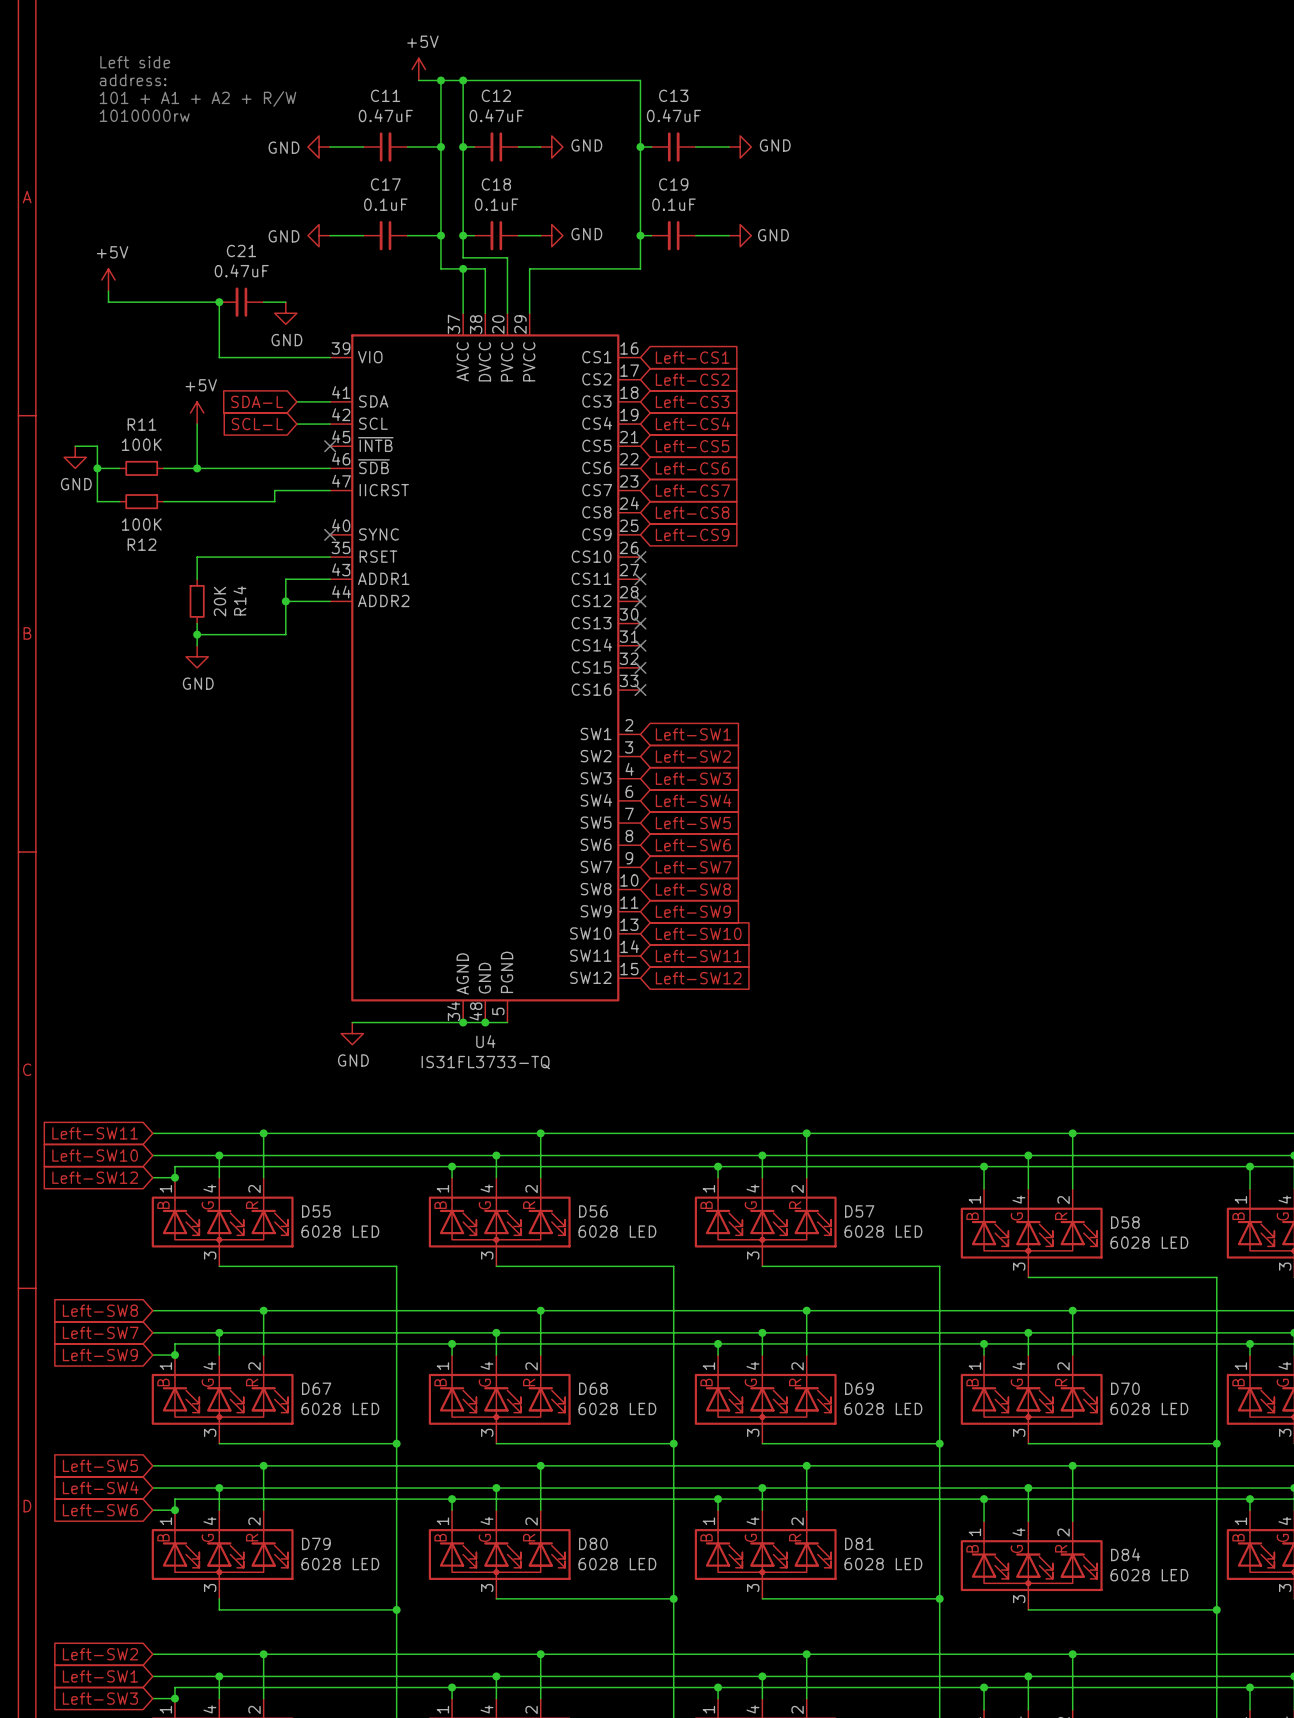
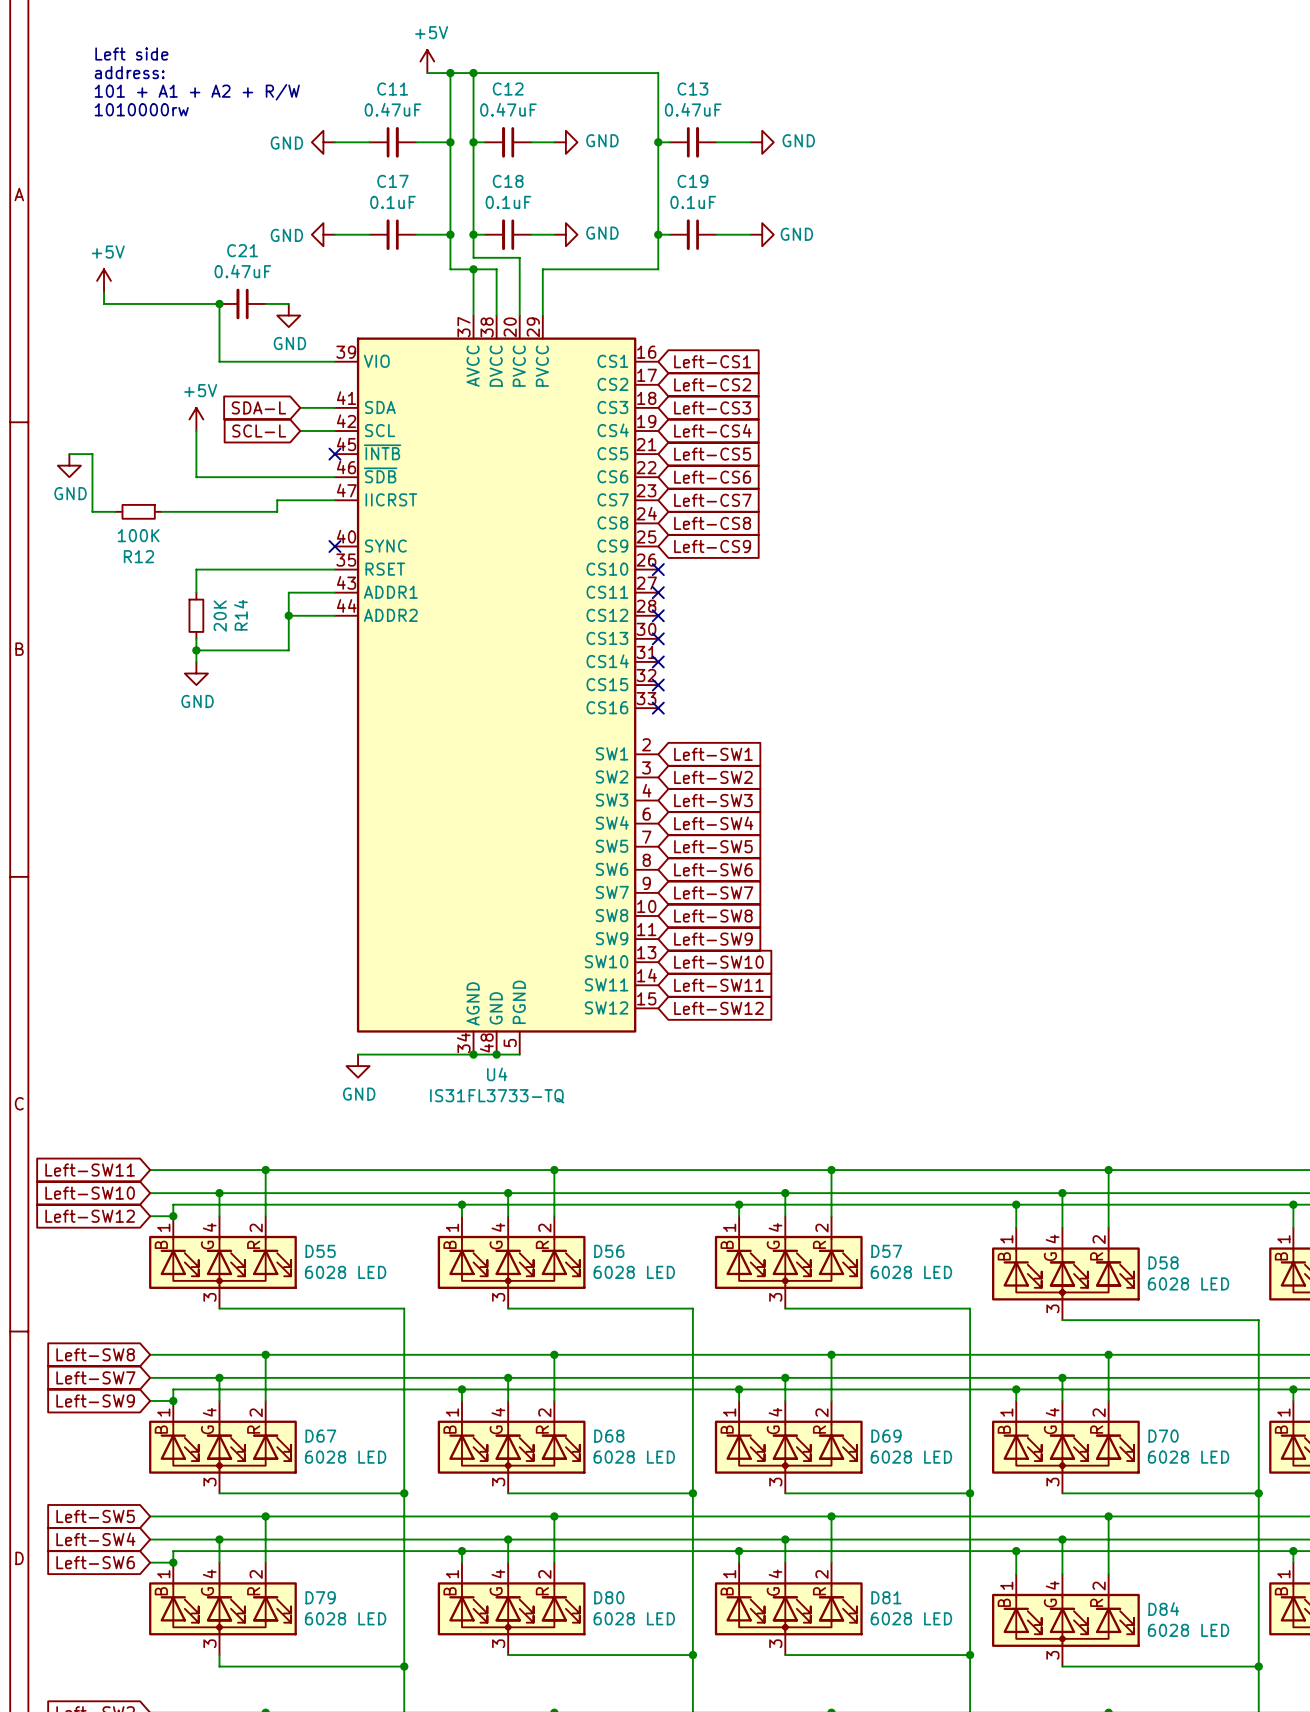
wire: (97, 468) (119, 468) -> none
junction: (97, 468) -> none
R11: 100K (141, 468) -> none
wire: (163, 468) (197, 468) -> none
junction: (197, 468) -> none

